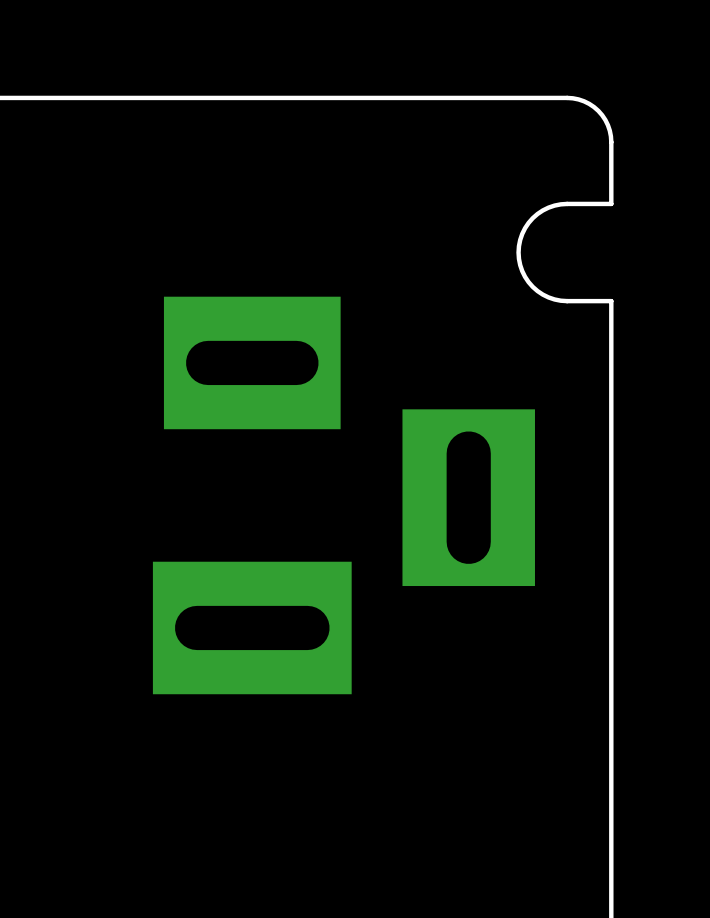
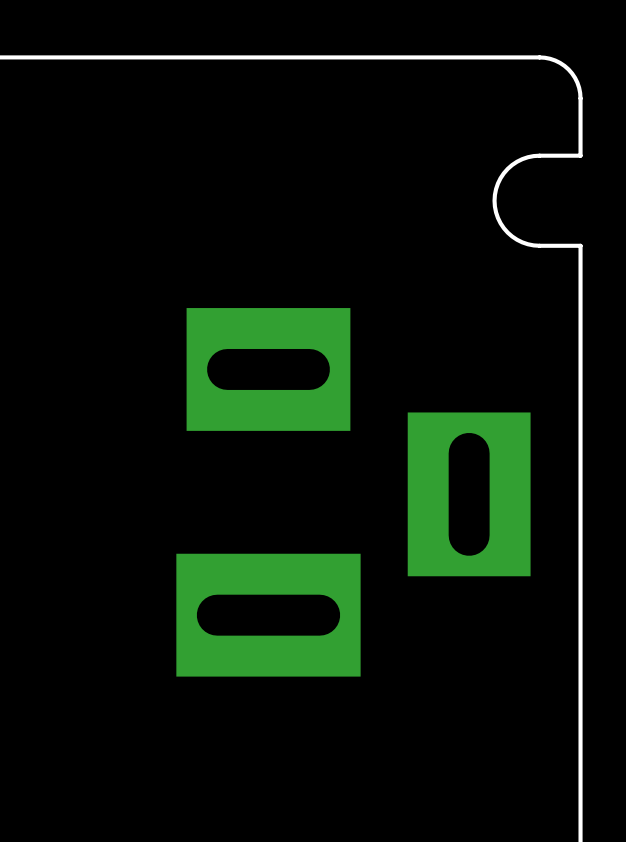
part position: (343, 495) -> (353, 492)

